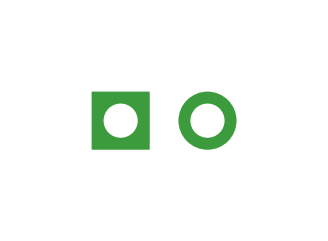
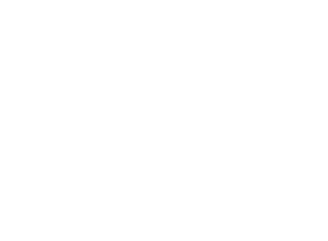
part: (164, 120) -> none

